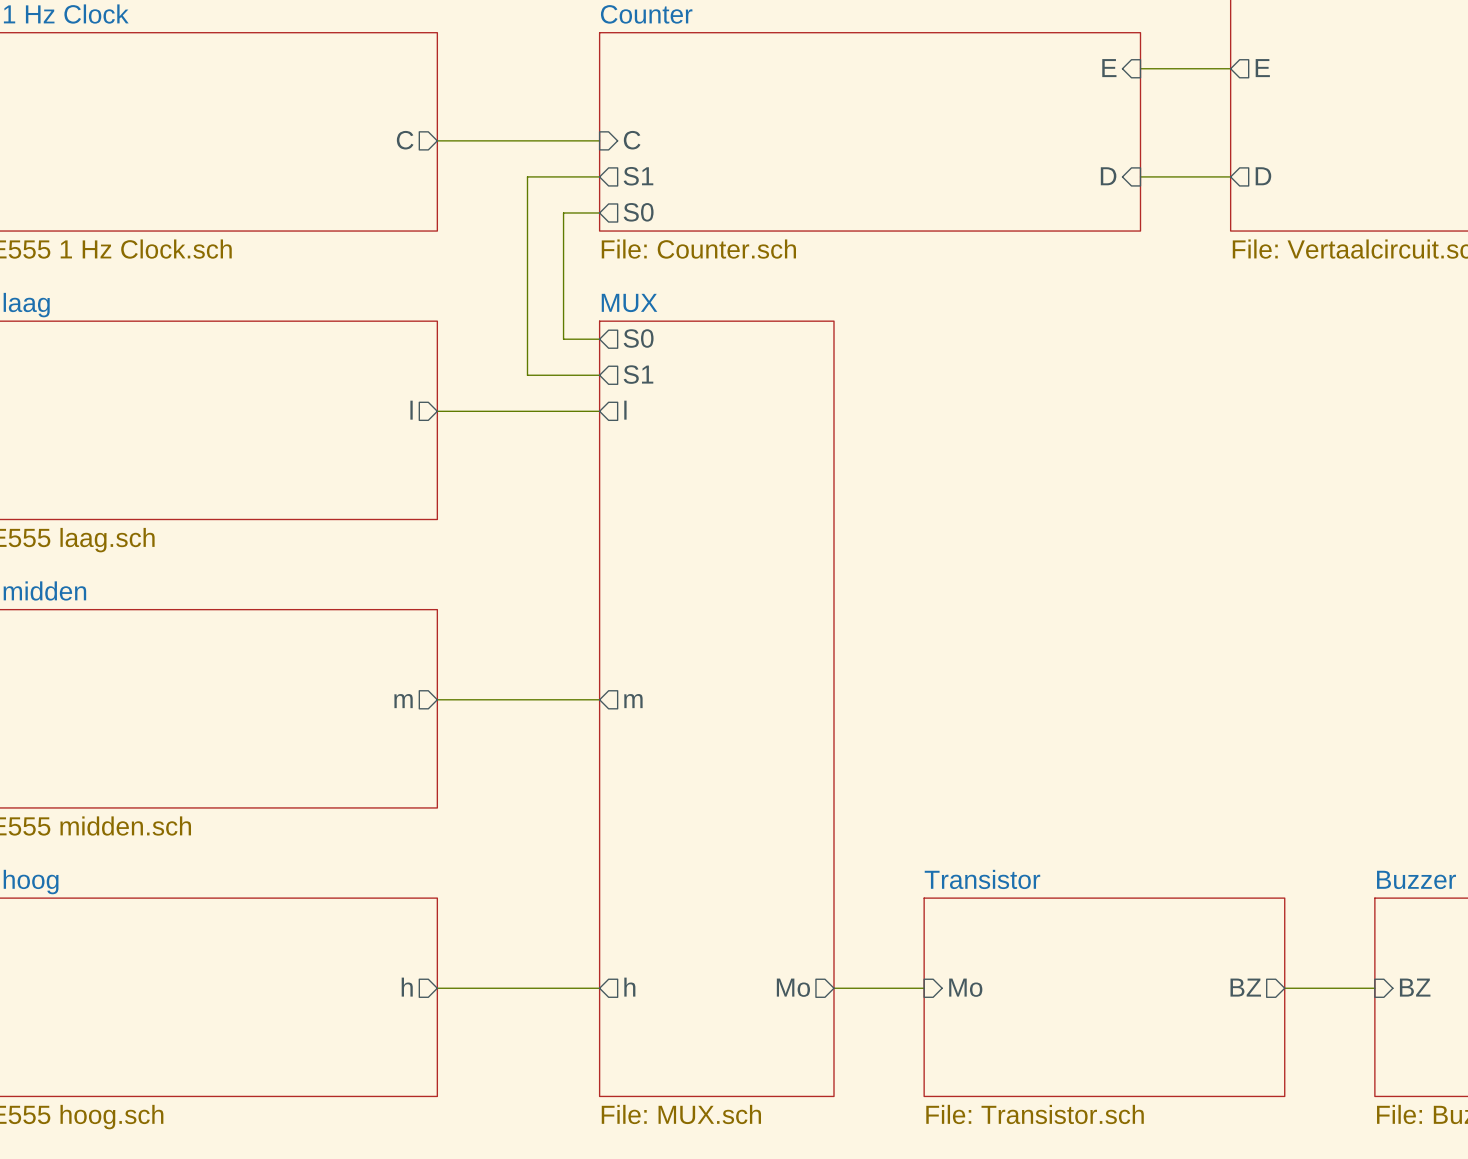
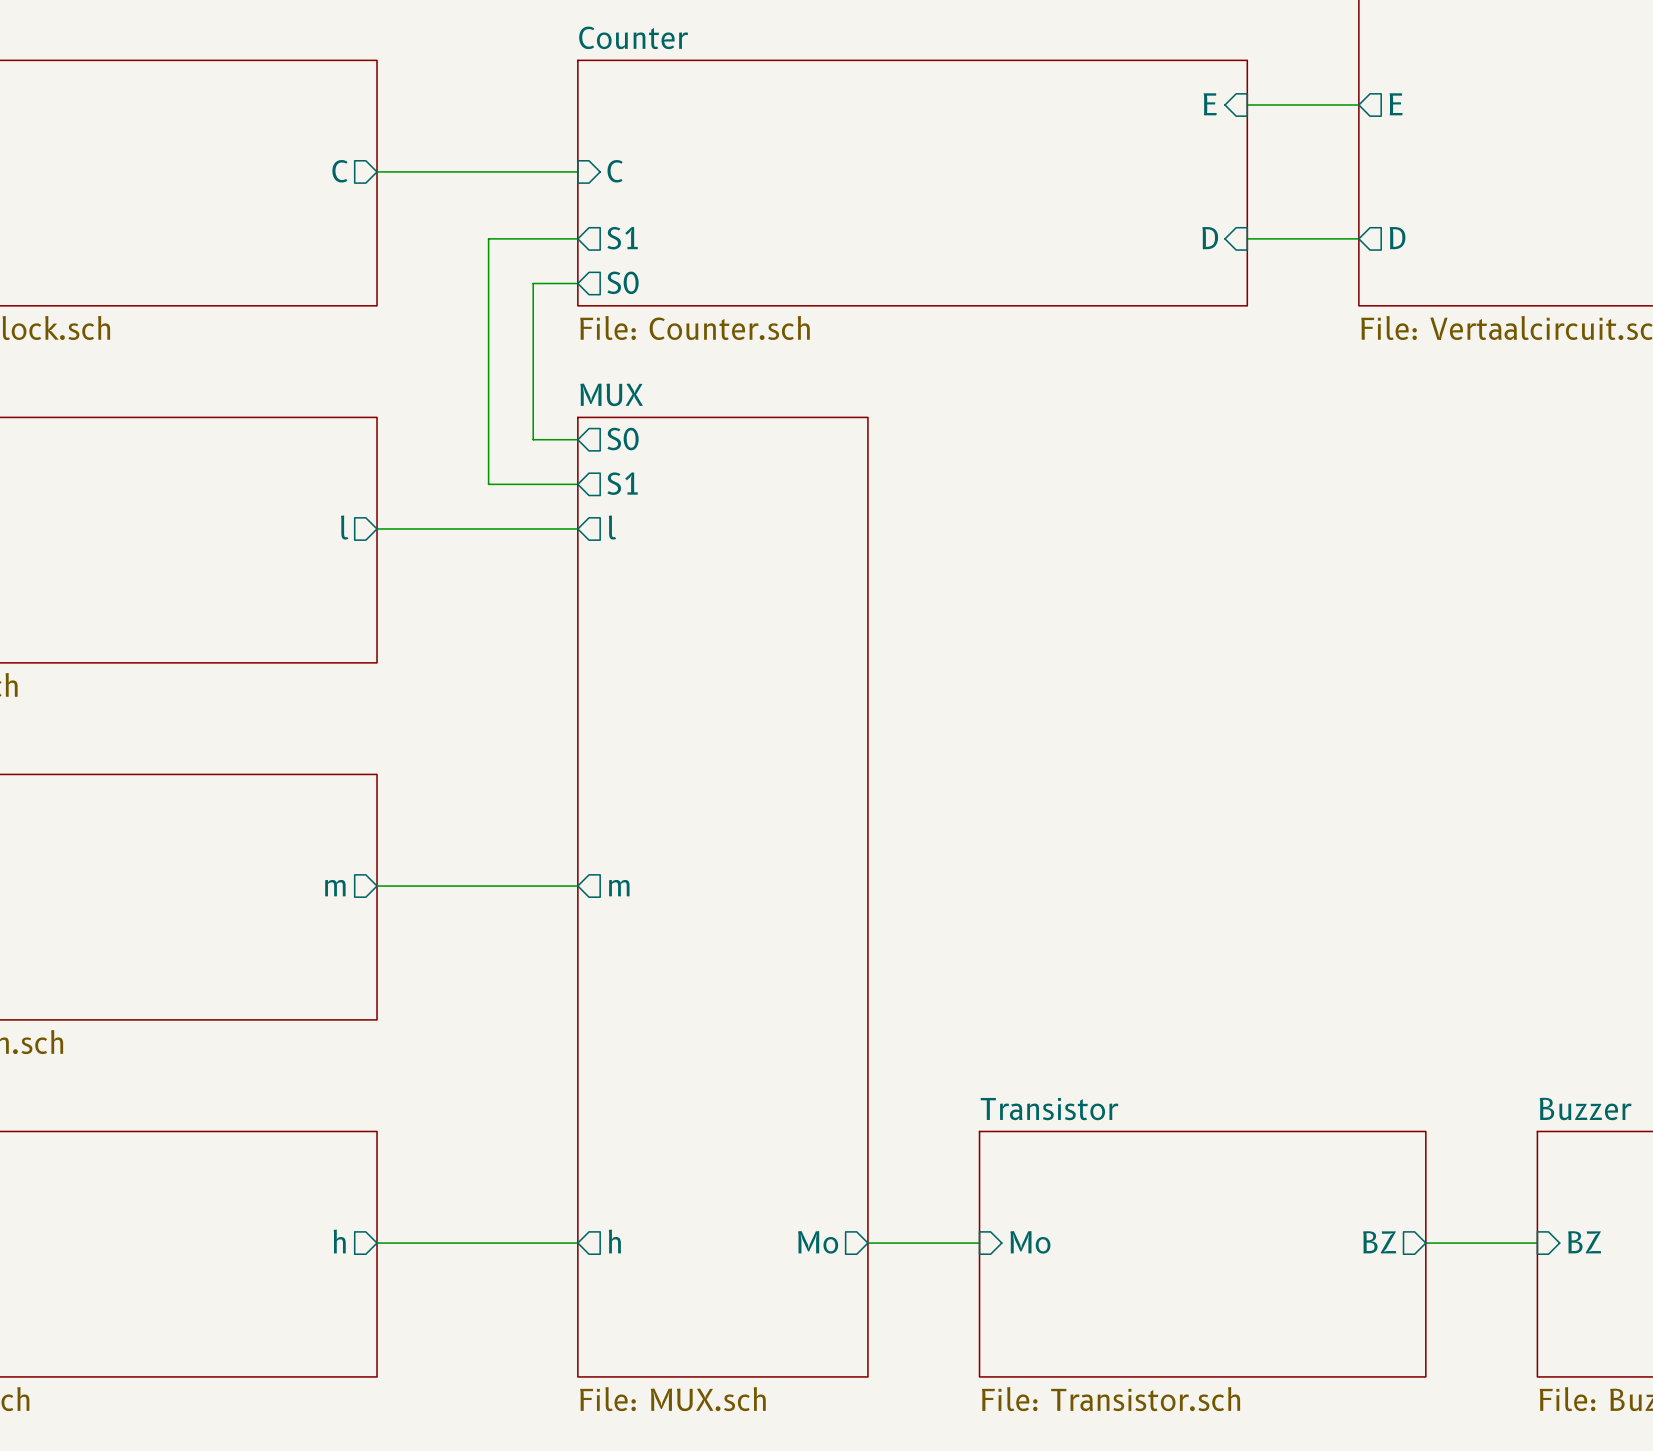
sheet pin position: C (405, 140) -> C (339, 171)
wire: (437, 140) (599, 140) -> (377, 171) (577, 171)
sheet pin position: C (632, 140) -> C (615, 171)

